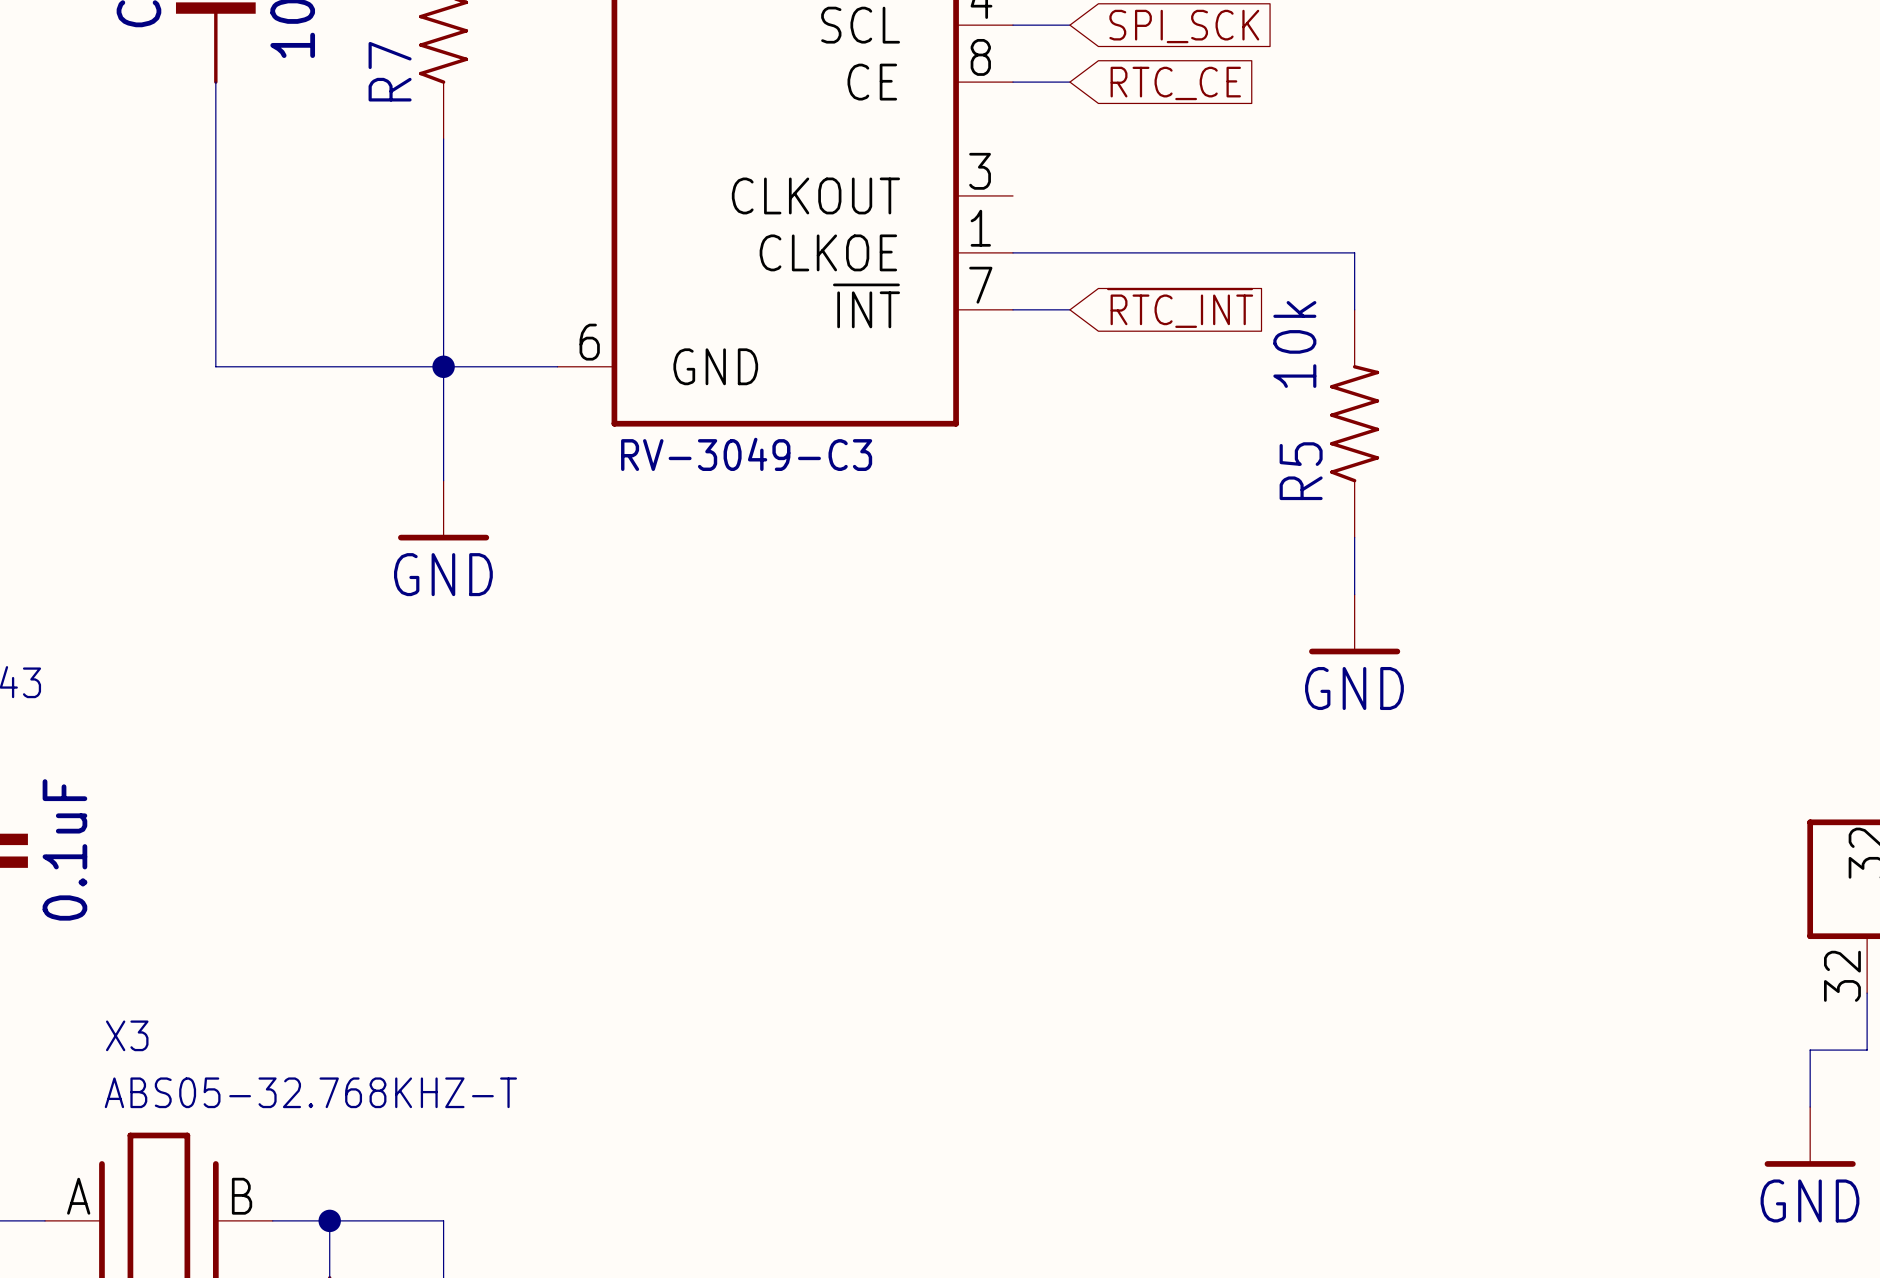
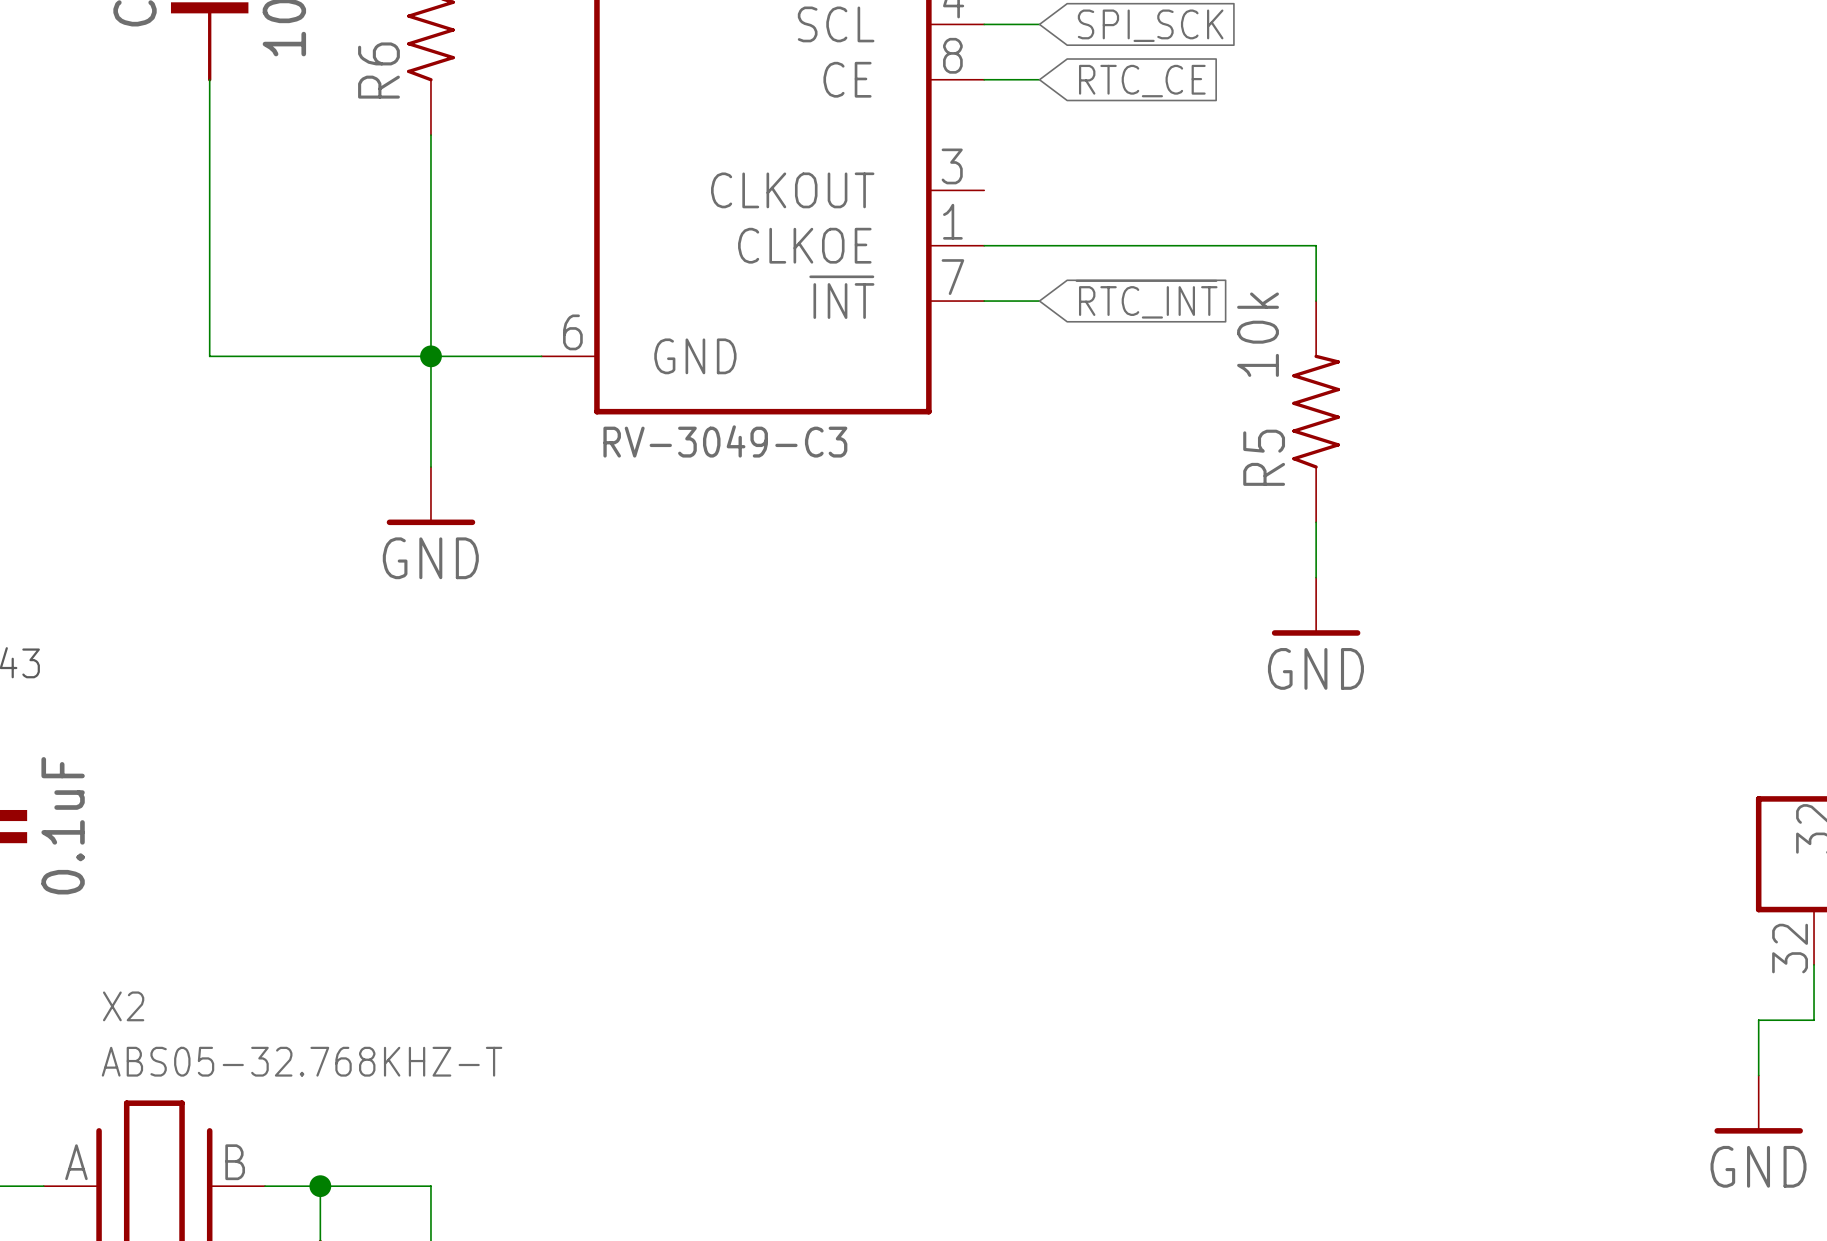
R7 name: R7 (390, 71) -> R6 (378, 70)
X3 name: X3 (127, 1035) -> X2 (123, 1006)

